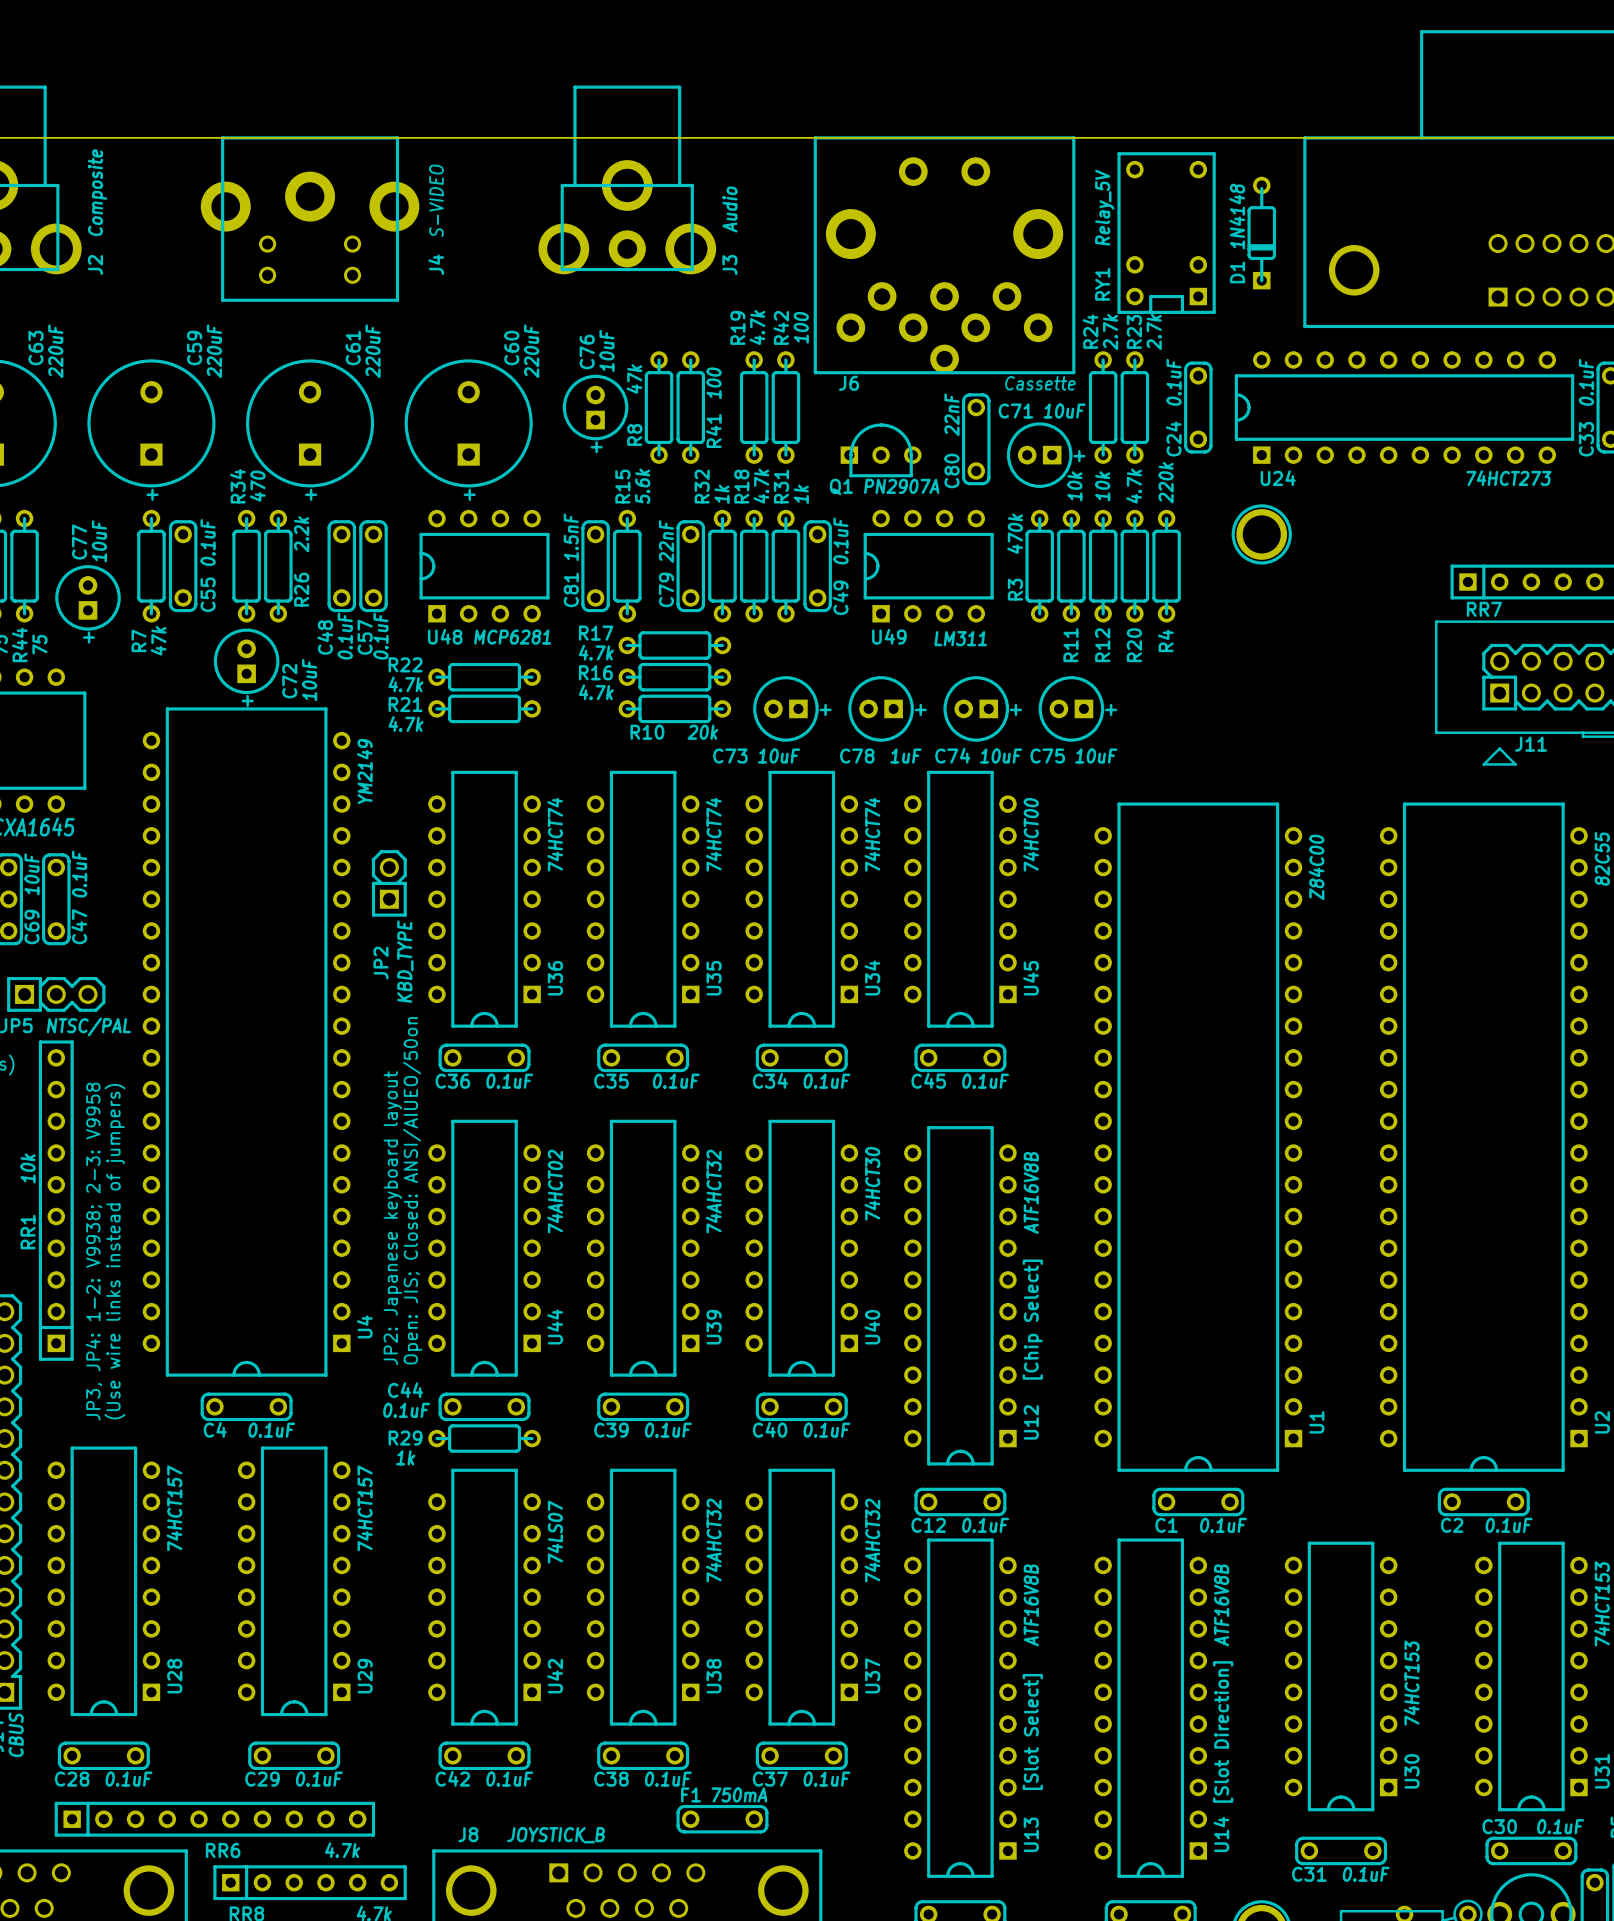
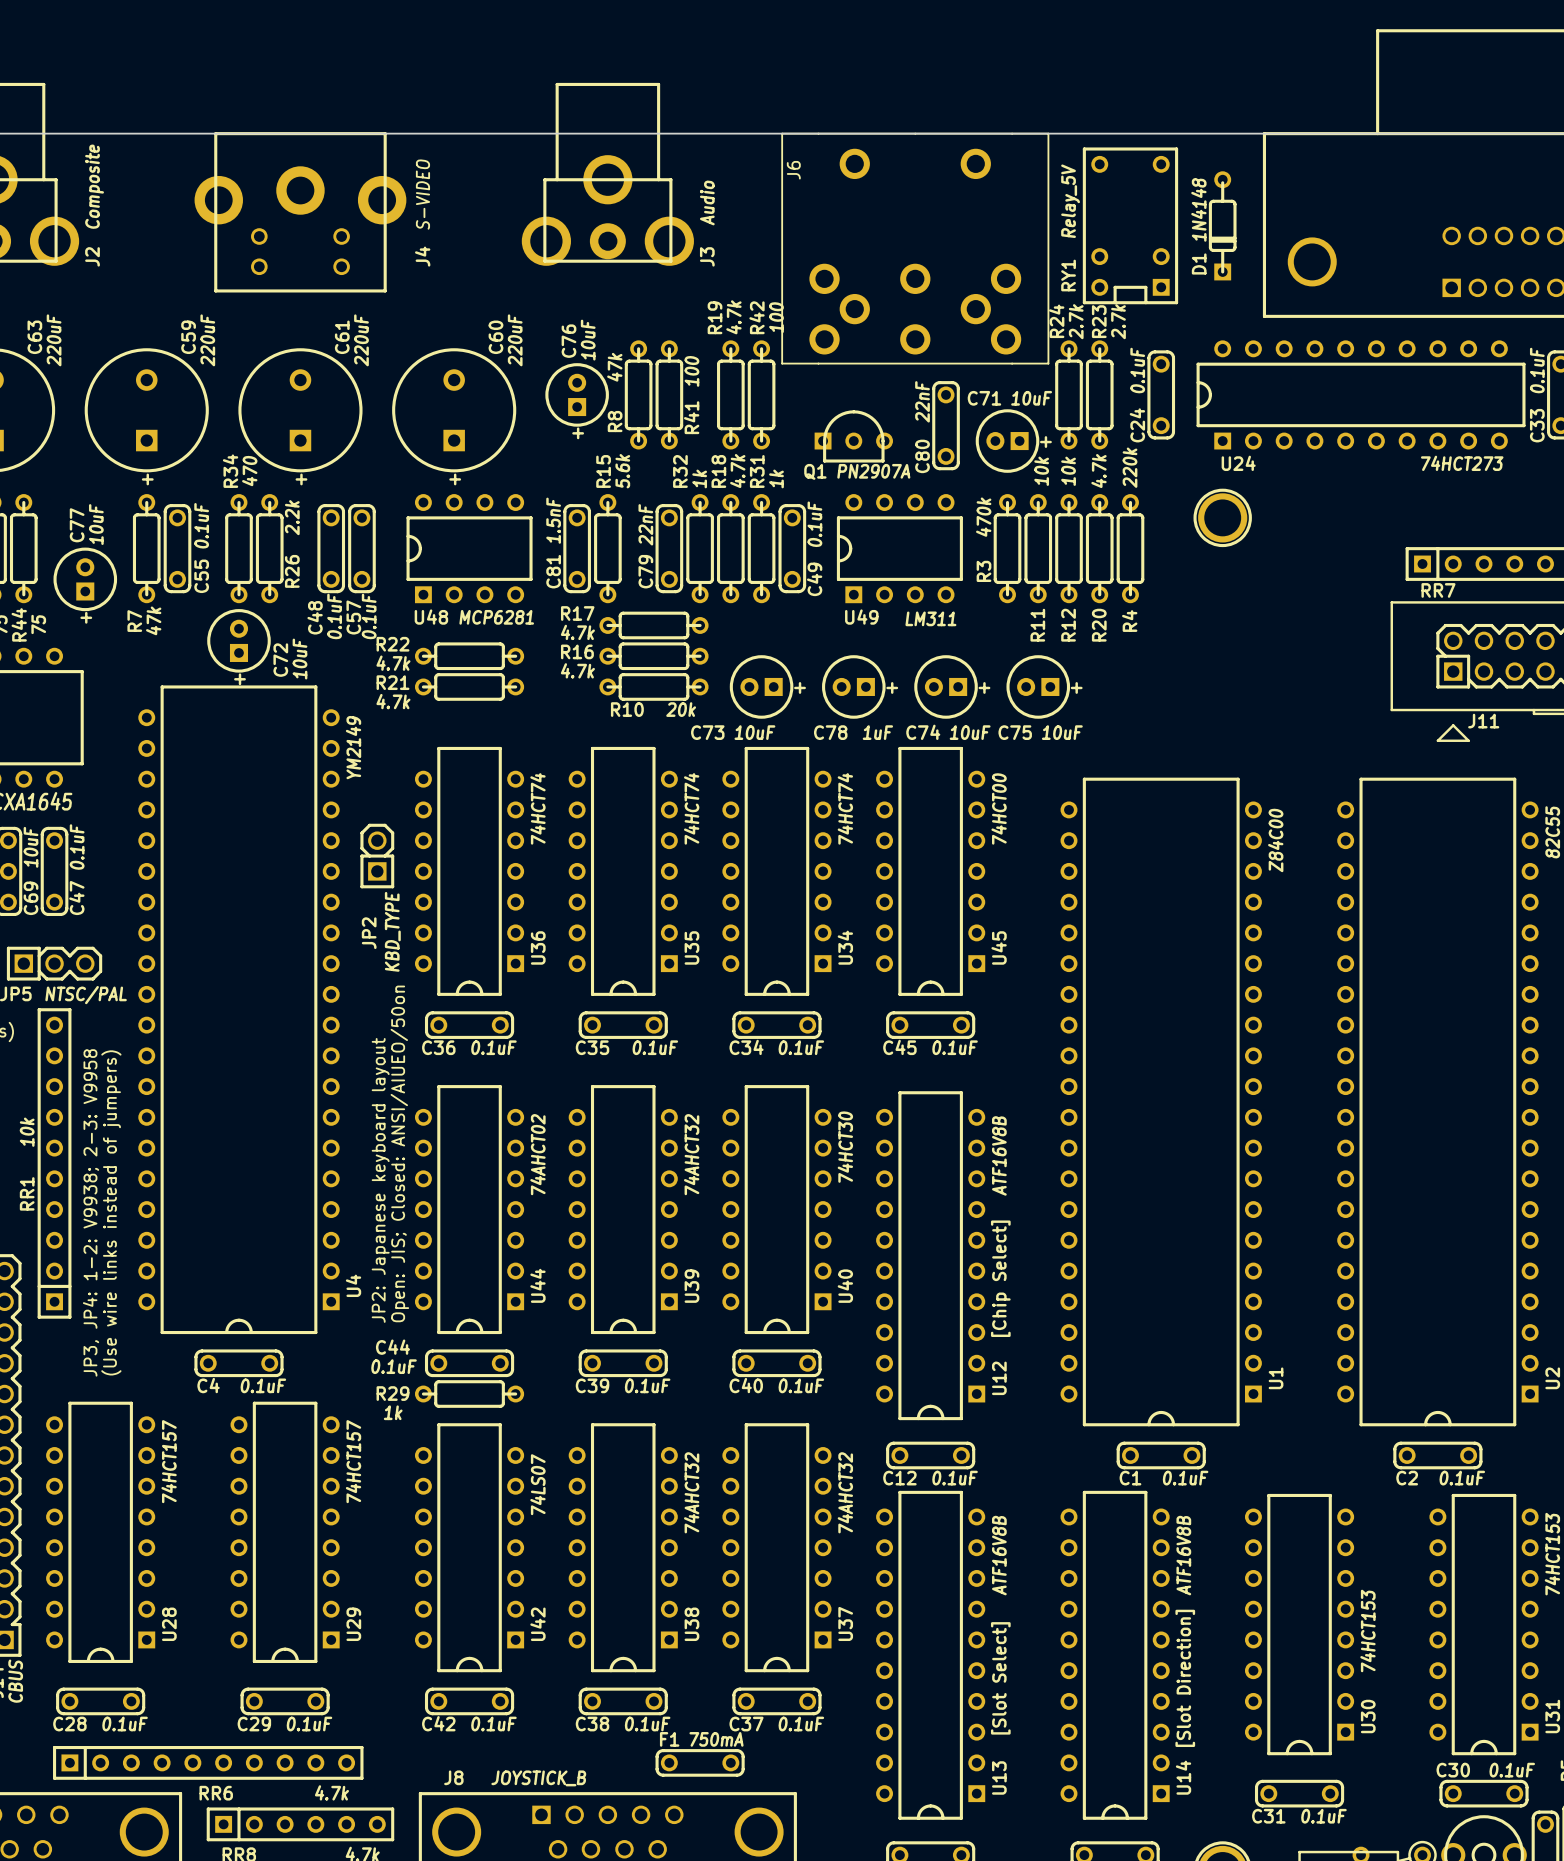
J6 footprint: [813, 136, 1076, 375] -> [781, 132, 1050, 365]
J6 name position: J6 (849, 383) -> J6 (793, 170)
J6 value: Cassette (1040, 383) -> none

